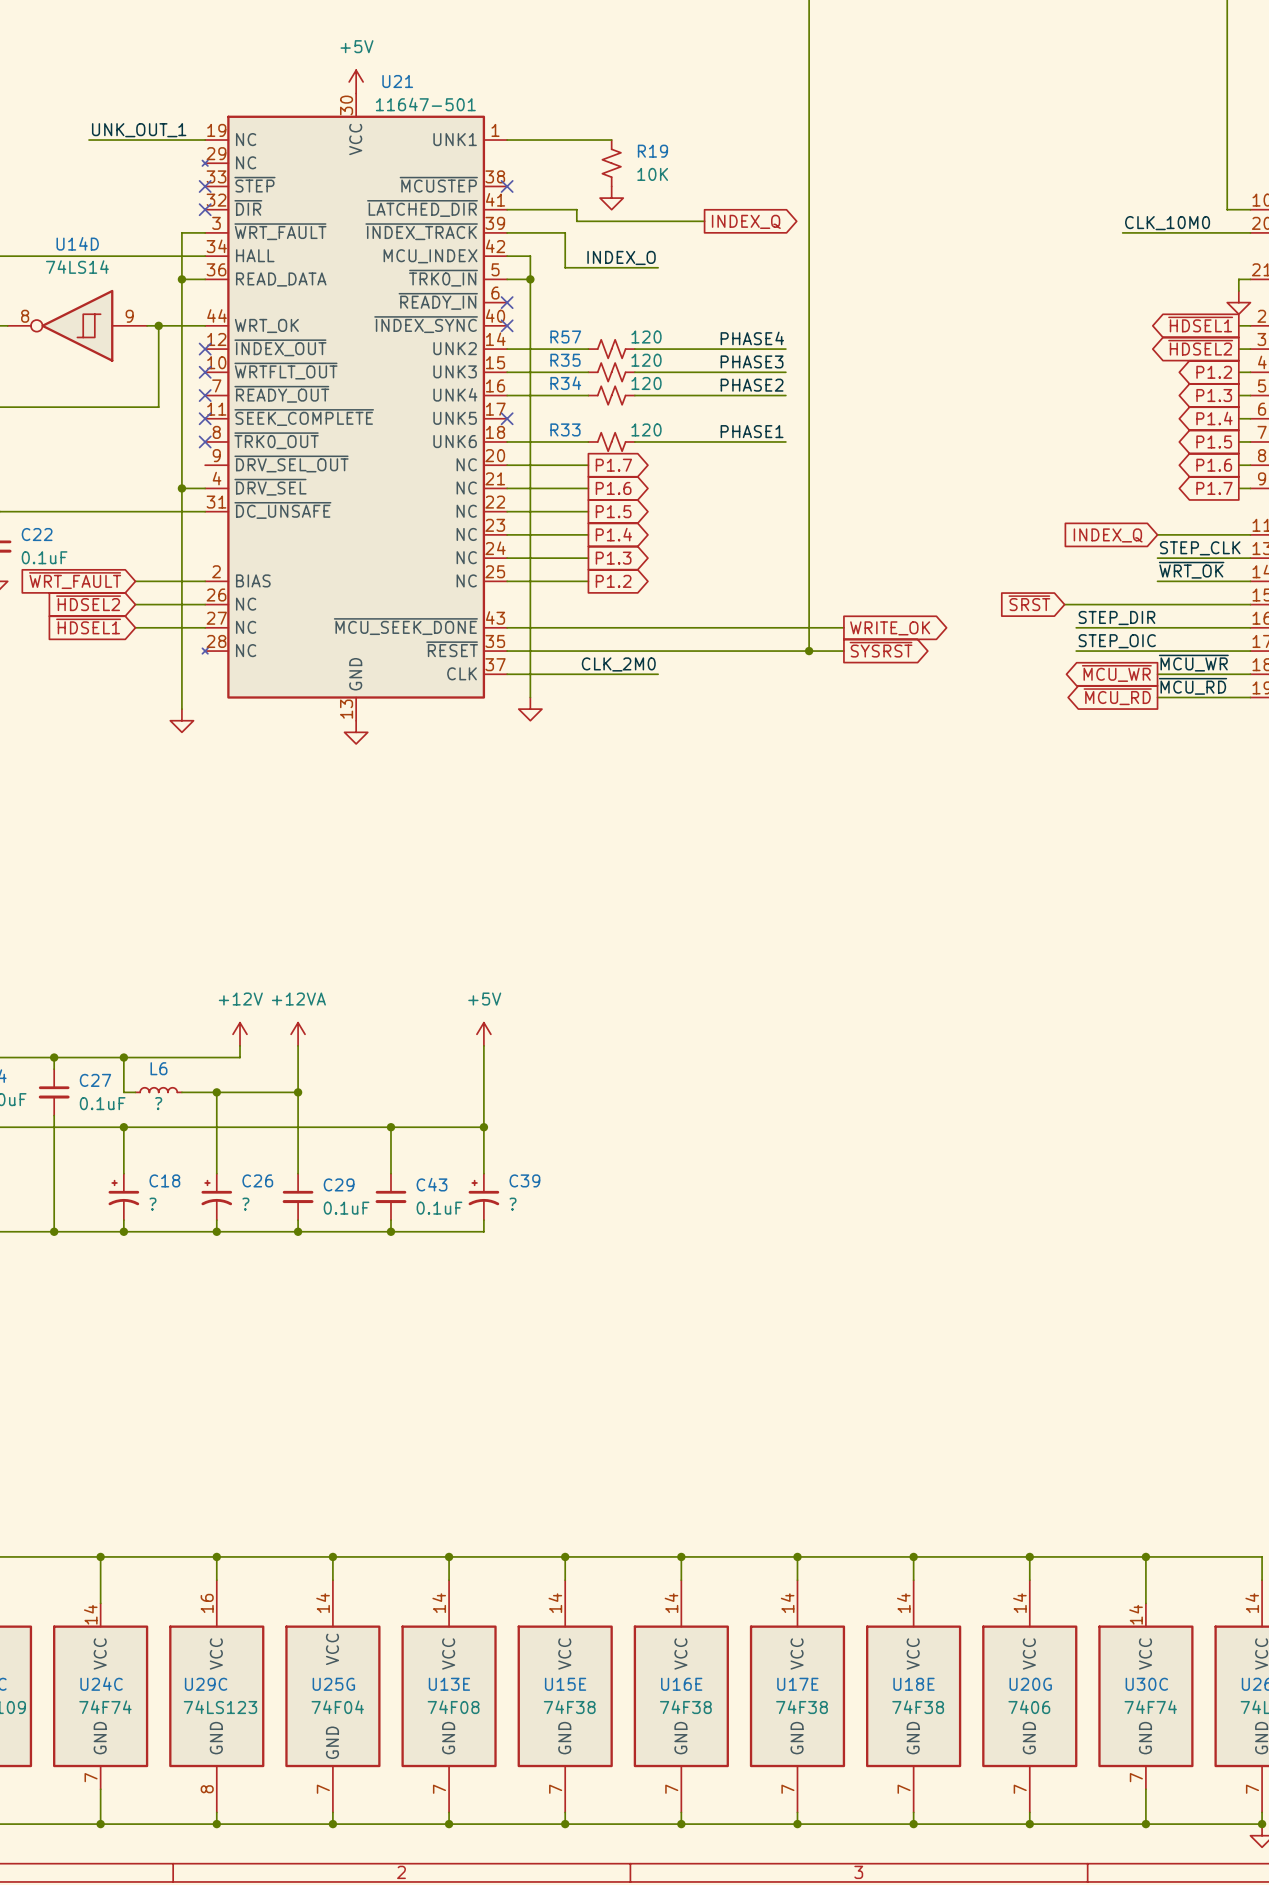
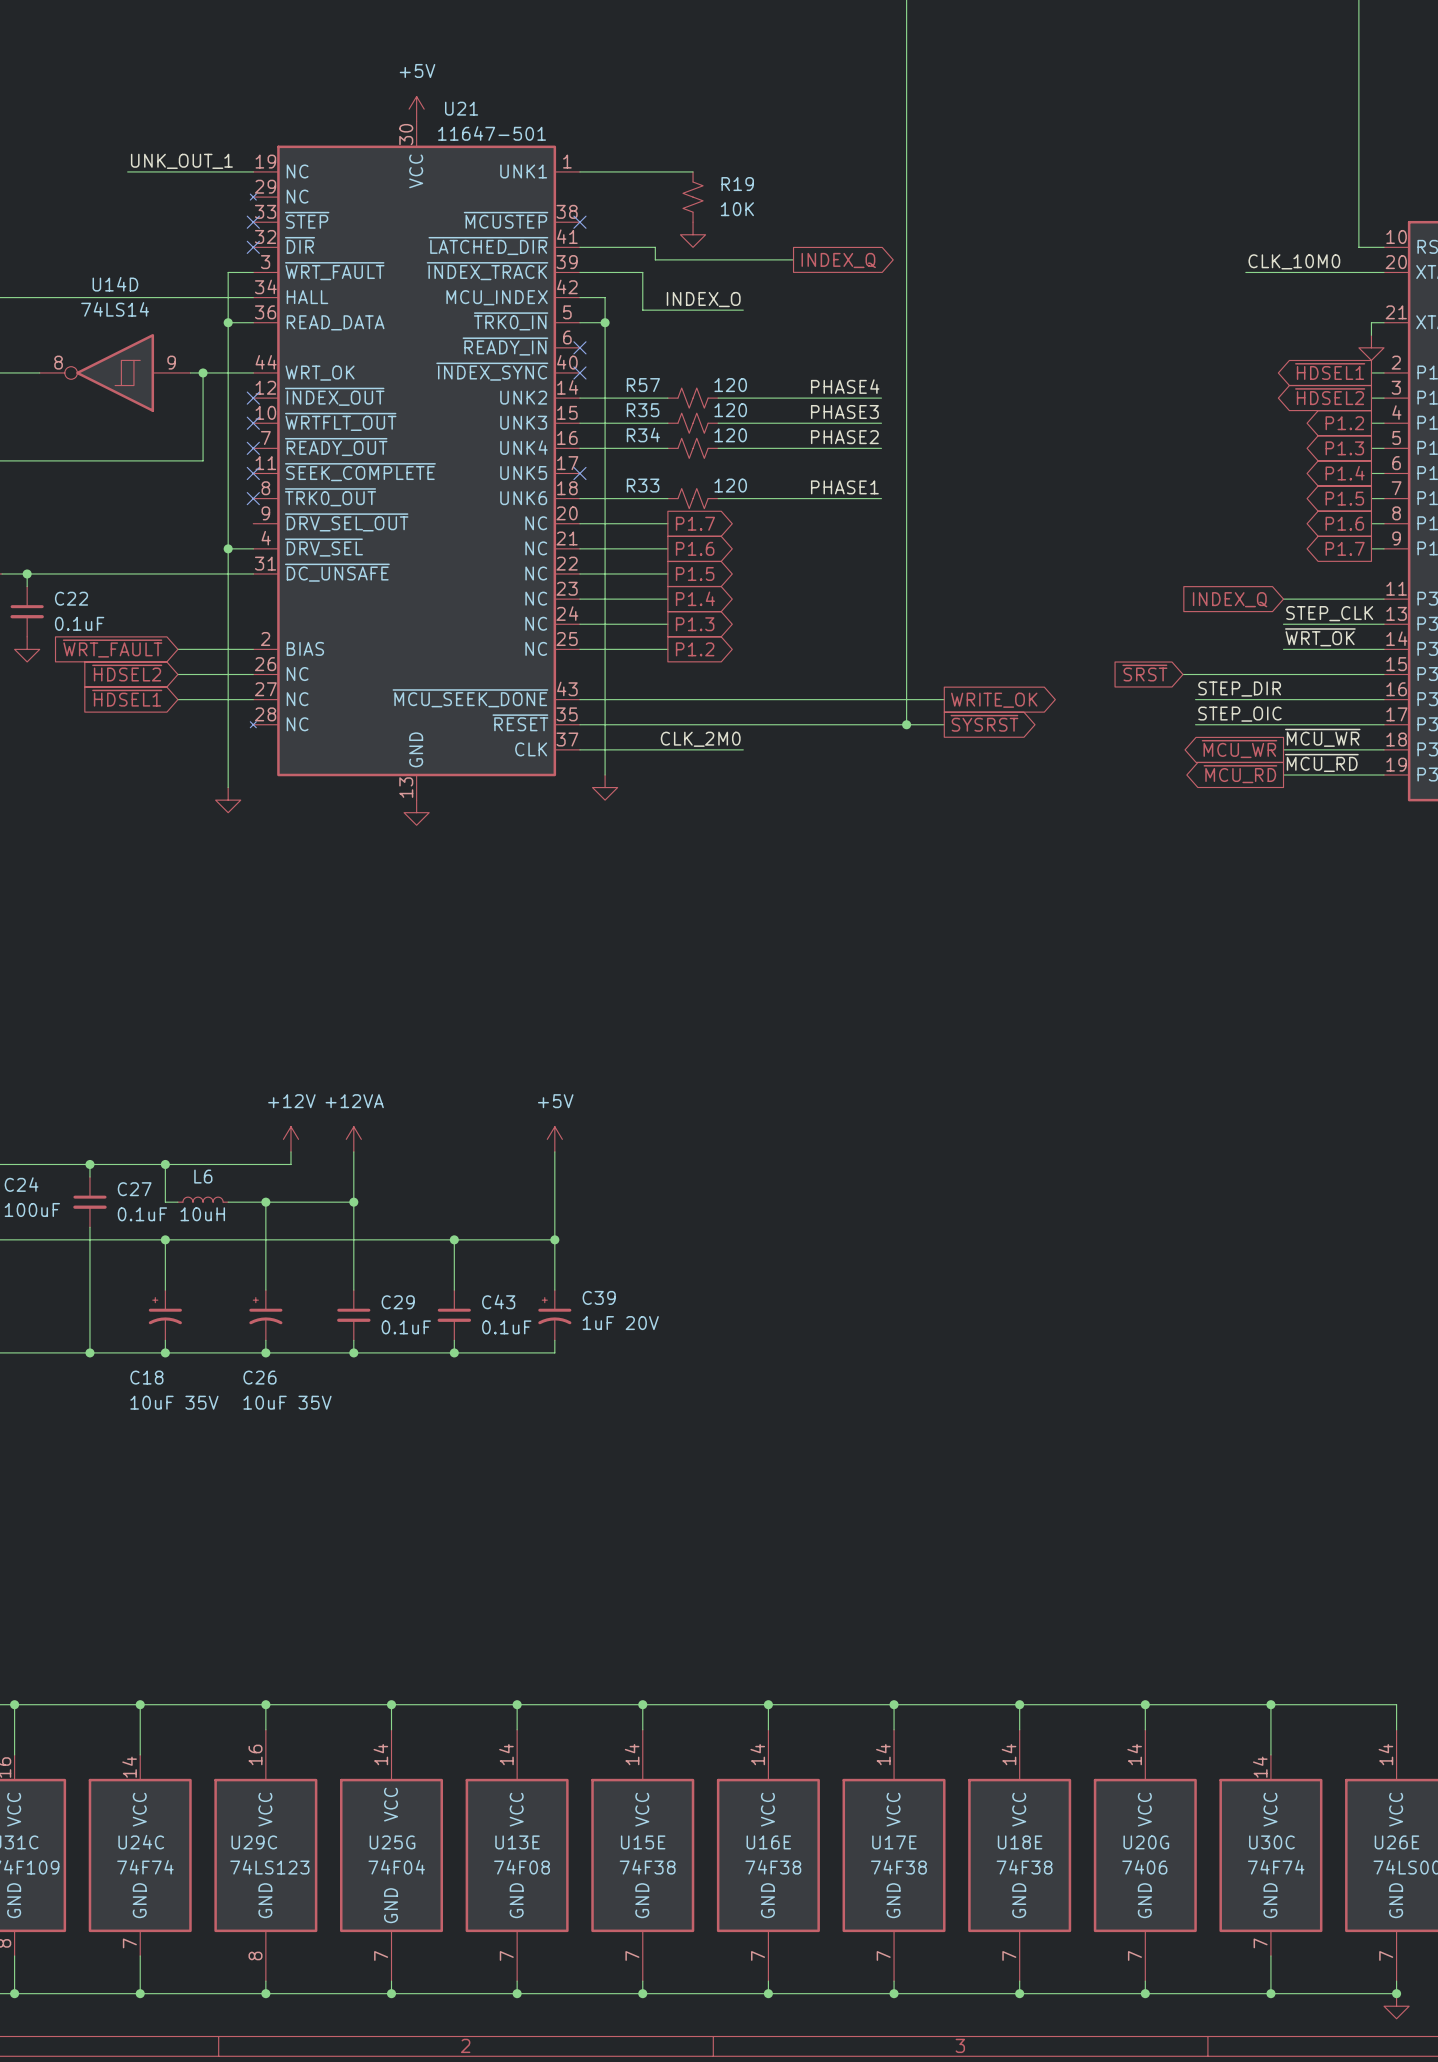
L6 value: ? (158, 1103) -> 10uH (202, 1214)
C18 name position: C18 (164, 1180) -> C18 (146, 1377)
C26 name position: C26 (257, 1180) -> C26 (259, 1377)
C18 value: ? (152, 1204) -> 10uF 35V (174, 1402)
C26 value: ? (245, 1204) -> 10uF 35V (287, 1402)
C39 value: ? (513, 1204) -> 1uF 20V (620, 1323)

